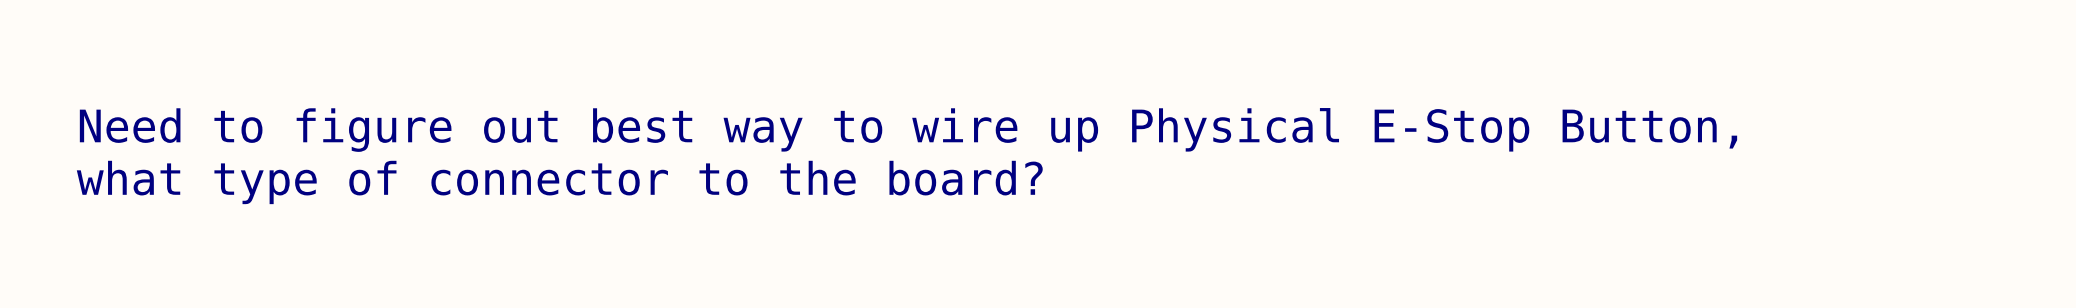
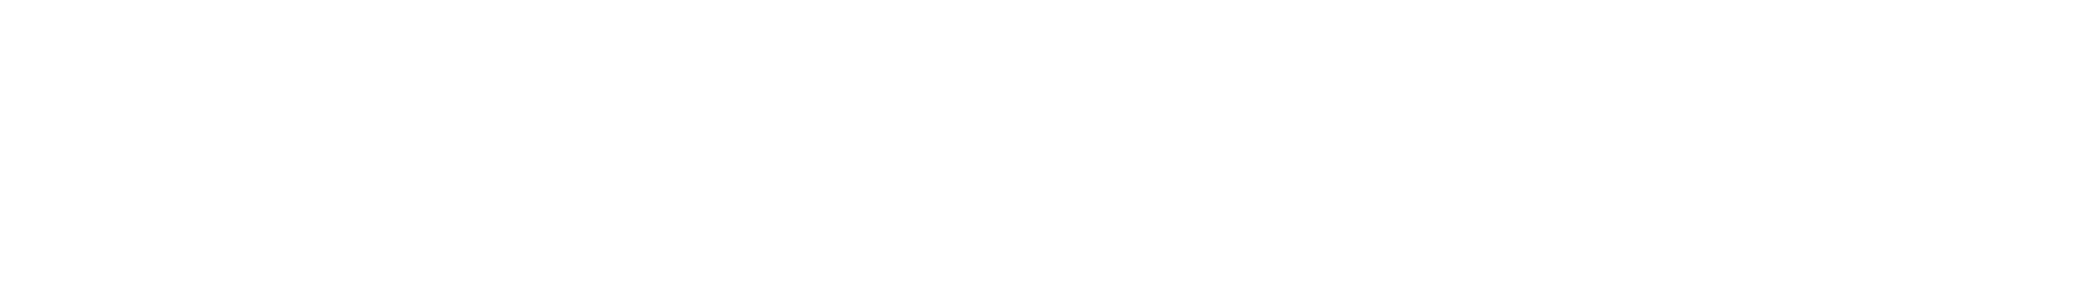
text: Need to figure out best way to wire up Physical E-Stop Button, (908, 129) -> none
text: what type of connector to the board? (559, 182) -> none

